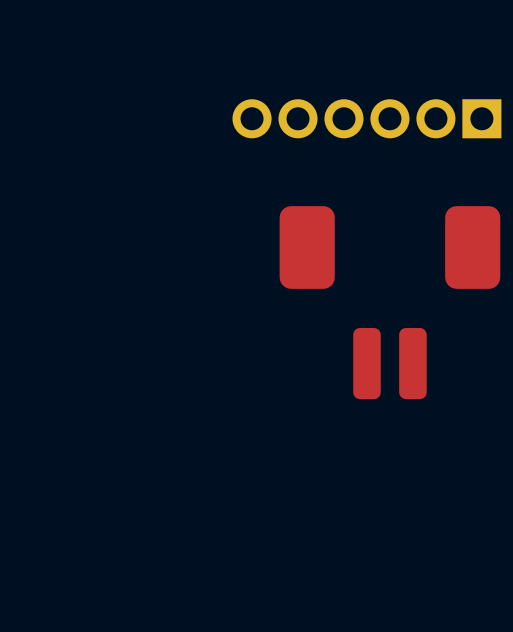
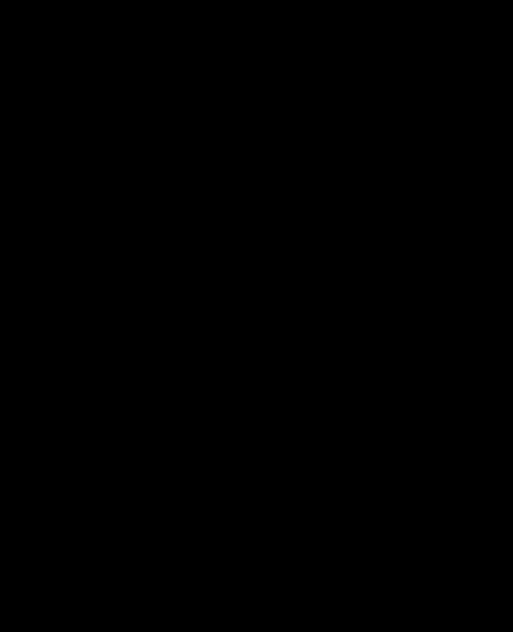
part: (366, 118) -> none
part: (389, 302) -> none

